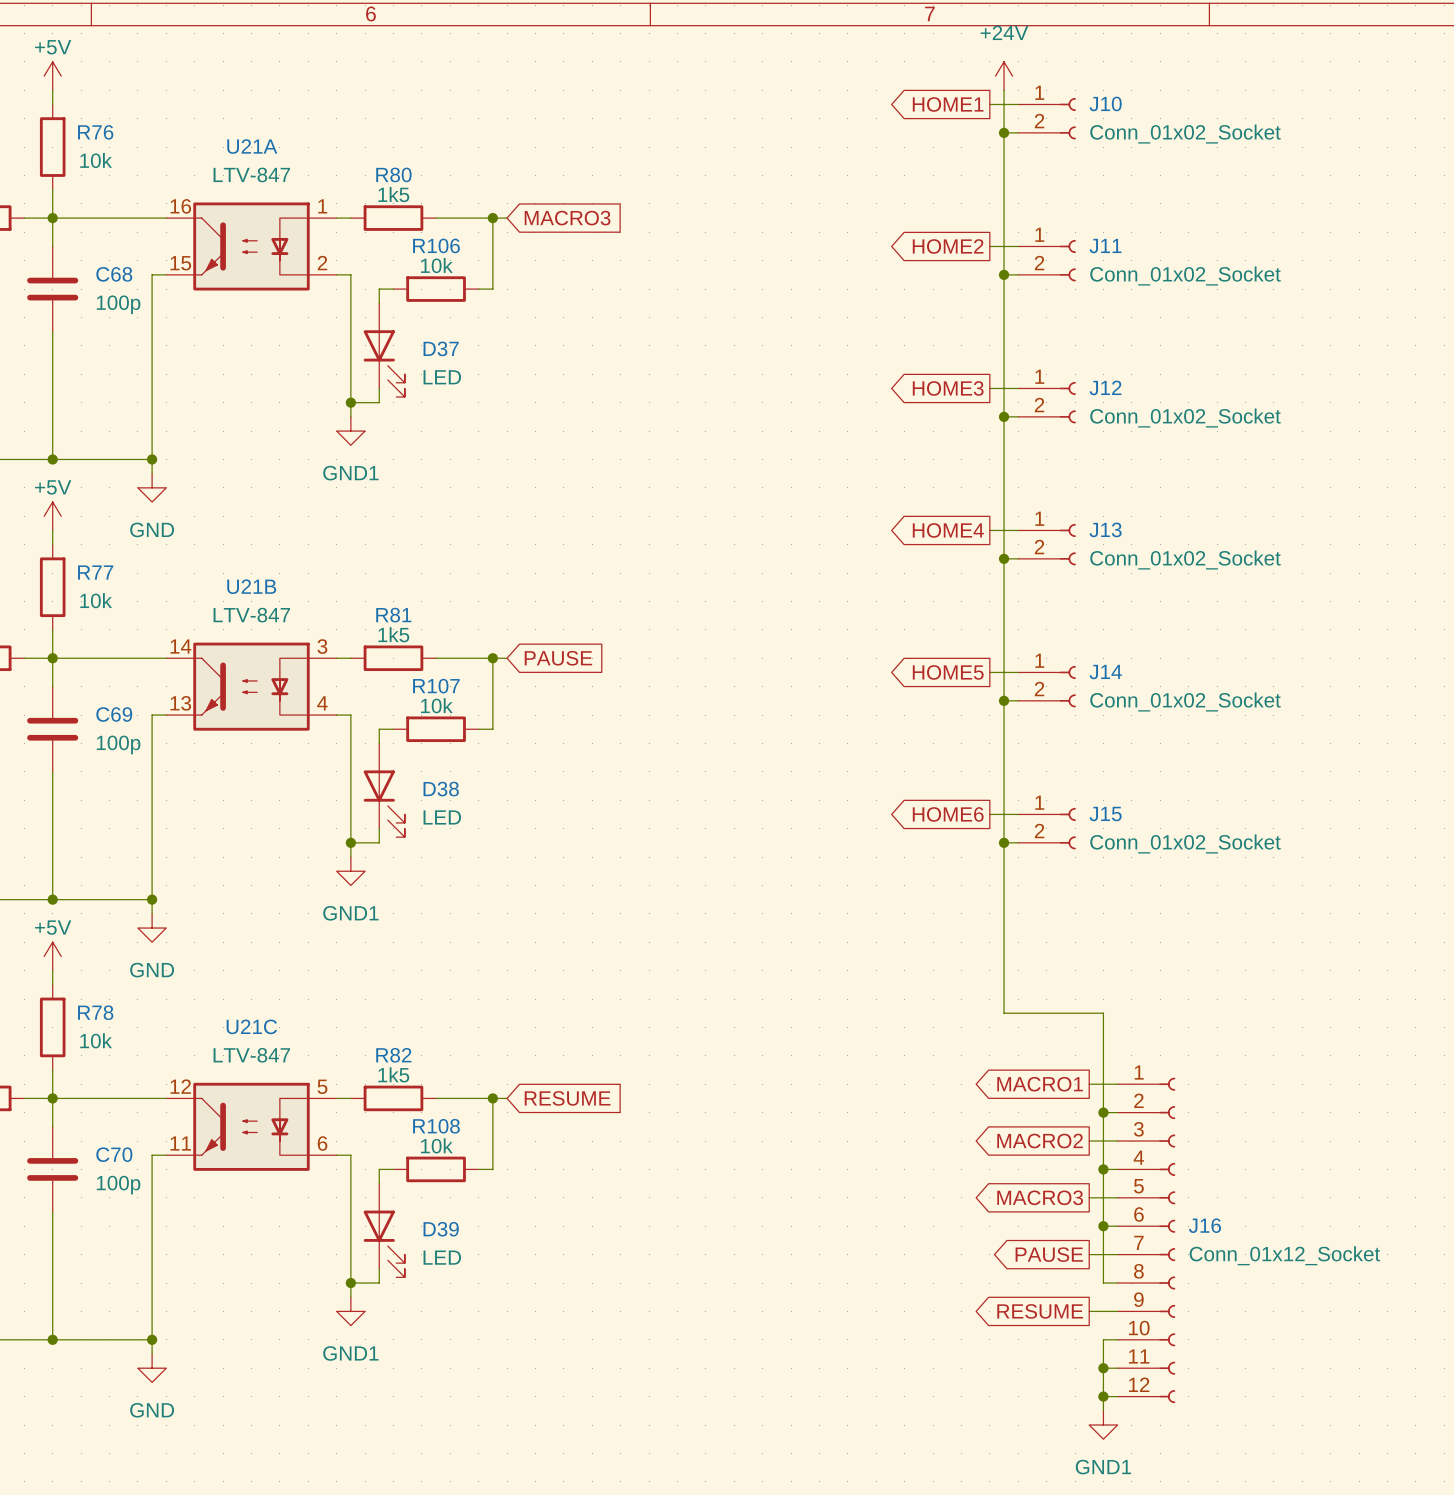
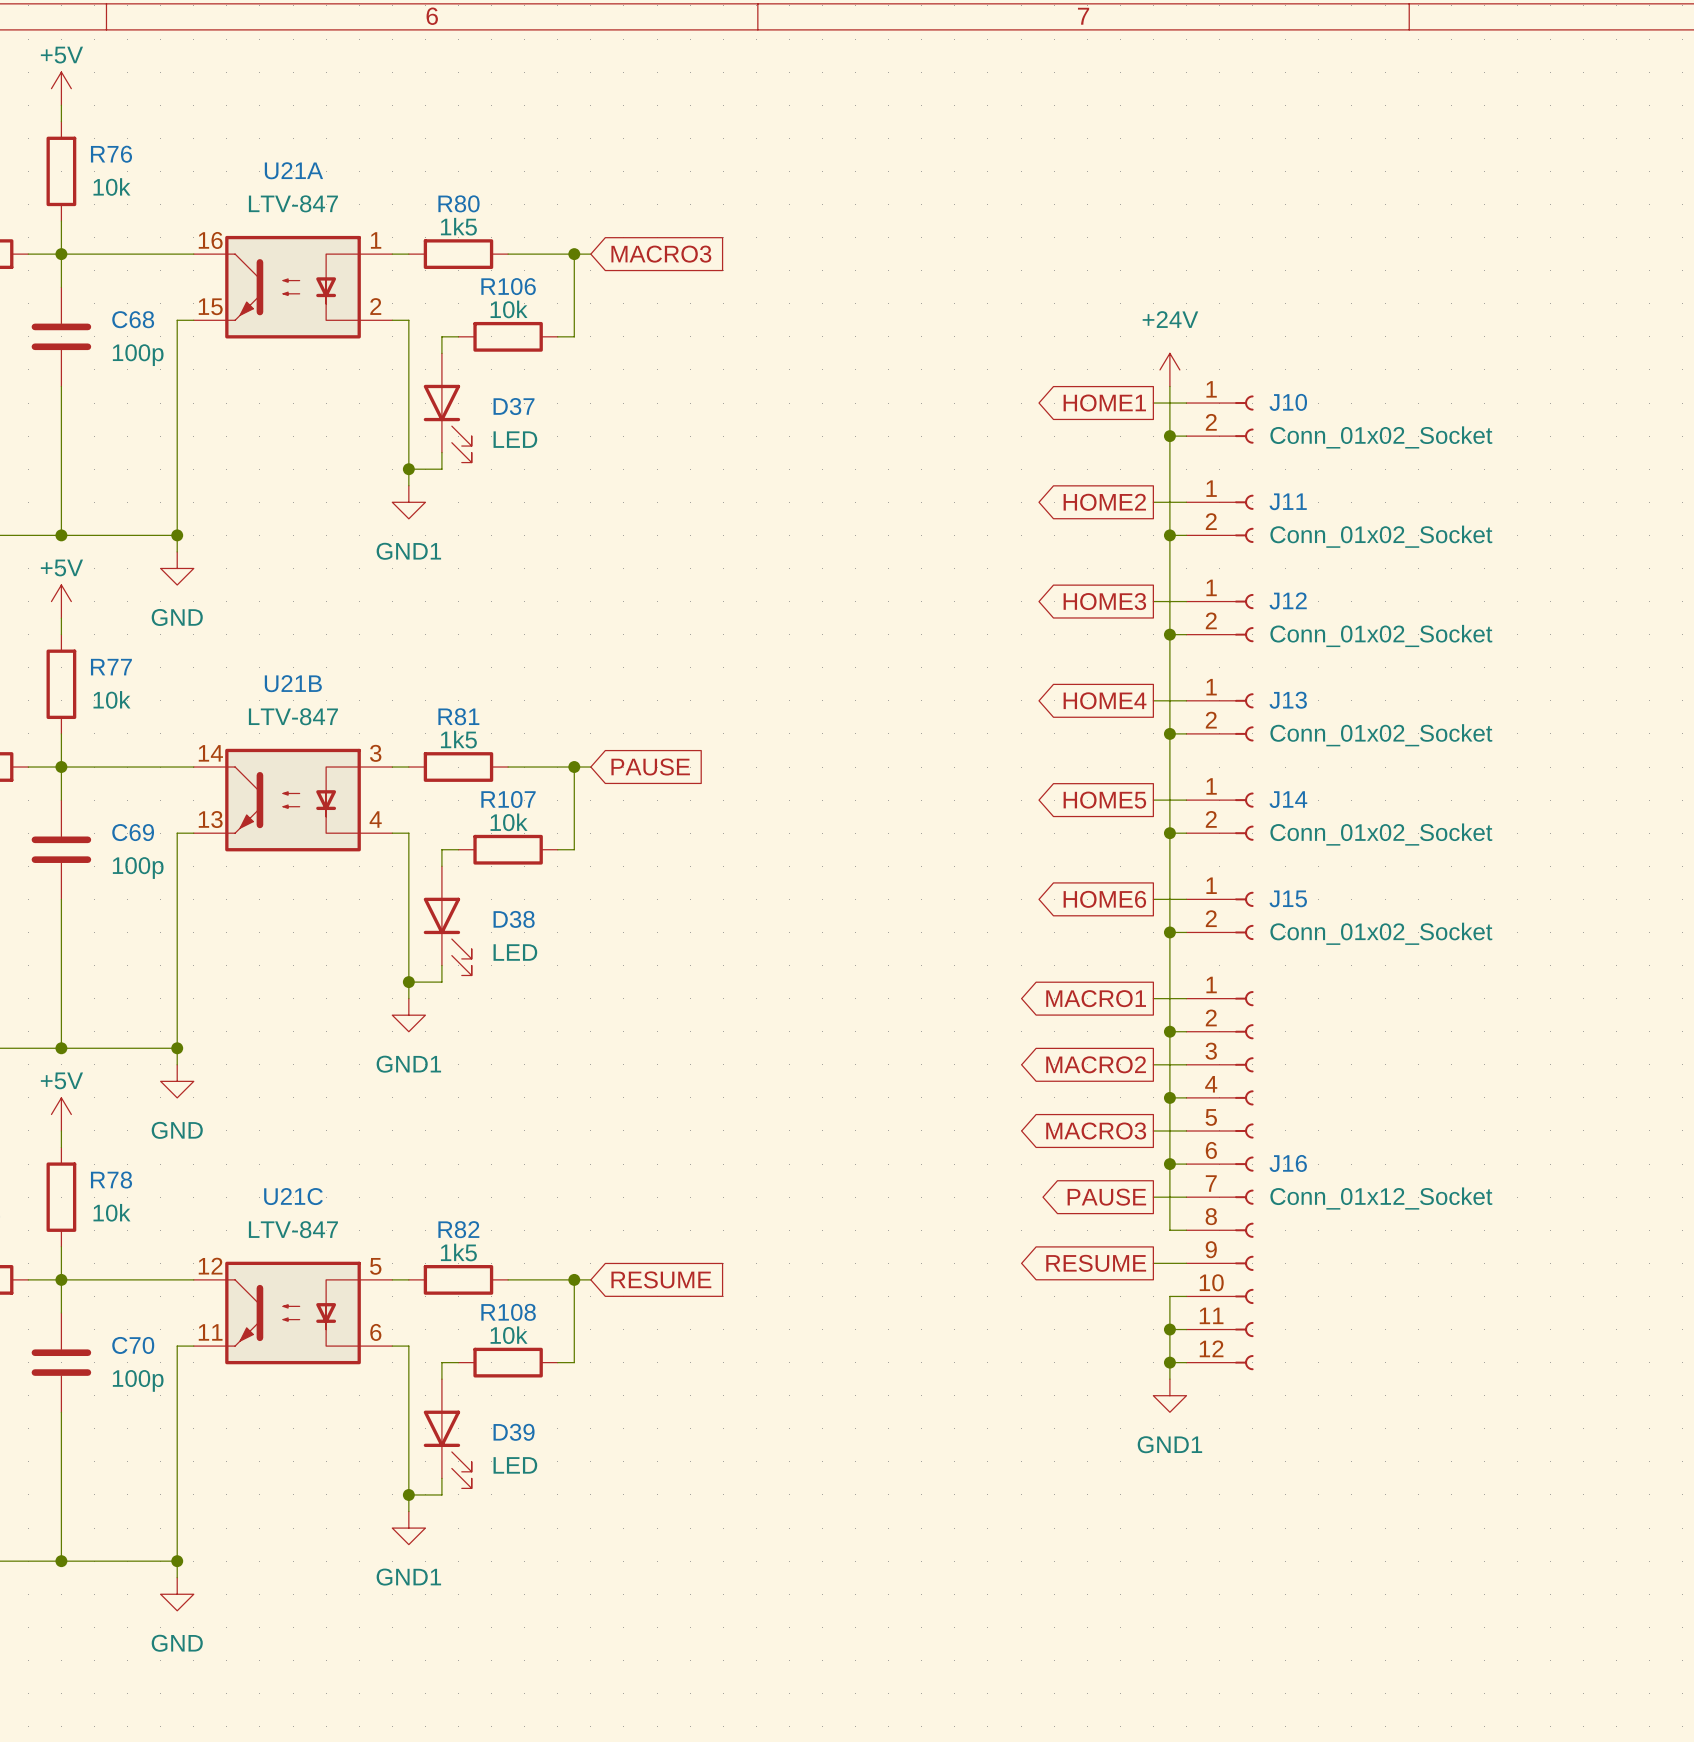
power symbol position: +24V (1004, 76) -> +24V (1169, 369)
wire: (1004, 90) (1004, 331) -> none
global label position: HOME1 (948, 104) -> HOME1 (1104, 403)
wire: (989, 104) (1018, 104) -> none
J10 position: (1047, 118) -> (1220, 419)
wire: (1004, 132) (1018, 132) -> none
junction: (1004, 132) -> none
global label position: HOME2 (948, 246) -> HOME2 (1104, 502)
wire: (989, 246) (1018, 246) -> (1153, 403) (1186, 403)
J11 position: (1047, 260) -> (1220, 518)
wire: (1004, 274) (1018, 274) -> (1169, 436) (1186, 436)
junction: (1004, 274) -> none
junction: none -> (1169, 436)
global label position: HOME3 (948, 388) -> HOME3 (1104, 601)
wire: (989, 388) (1018, 388) -> (1153, 502) (1186, 502)
J12 position: (1047, 402) -> (1220, 618)
wire: (1004, 416) (1018, 416) -> (1169, 535) (1186, 535)
junction: (1004, 416) -> none
junction: none -> (1169, 535)
wire: none -> (1153, 601) (1186, 601)
global label position: HOME4 (948, 530) -> HOME4 (1105, 700)
wire: (989, 530) (1018, 530) -> (1153, 800) (1186, 800)
wire: none -> (1169, 634) (1186, 634)
J13 position: (1047, 544) -> (1220, 717)
wire: (1004, 558) (1018, 558) -> (1169, 833) (1186, 833)
junction position: (1004, 558) -> (1169, 634)
junction: none -> (1169, 733)
global label position: HOME5 (948, 672) -> HOME5 (1104, 800)
wire: (989, 672) (1018, 672) -> (1153, 899) (1186, 899)
J14 position: (1047, 686) -> (1220, 816)
wire: (1004, 700) (1018, 700) -> (1169, 932) (1186, 932)
junction position: (1004, 700) -> (1169, 833)
junction: none -> (1169, 932)
global label position: HOME6 (948, 814) -> HOME6 (1104, 899)
wire: (989, 814) (1018, 814) -> (1153, 700) (1186, 700)
J15 position: (1047, 828) -> (1220, 915)
wire: (1004, 842) (1018, 842) -> (1169, 733) (1186, 733)
junction: (1004, 842) -> none
junction: none -> (1169, 1031)
junction: none -> (1169, 1097)
junction: none -> (1169, 1164)
wire: (1004, 1013) (1103, 1013) (1103, 1283) (1117, 1283) -> (1169, 1180) (1169, 1230) (1186, 1230)
global label position: MACRO1 (1040, 1084) -> MACRO1 (1096, 998)
wire: (1089, 1084) (1117, 1084) -> (1153, 998) (1186, 998)
wire: (1103, 1112) (1117, 1112) -> (1169, 1031) (1186, 1031)
junction: (1103, 1112) -> none
junction: none -> (1169, 1329)
global label position: MACRO2 (1040, 1141) -> MACRO2 (1096, 1064)
wire: (1089, 1141) (1117, 1141) -> (1153, 1064) (1186, 1064)
junction: none -> (1169, 1362)
wire: (1103, 1169) (1117, 1169) -> (1169, 1097) (1186, 1097)
junction: (1103, 1169) -> none
global label position: MACRO3 (1040, 1197) -> MACRO3 (1096, 1130)
wire: (1089, 1197) (1117, 1197) -> (1153, 1130) (1186, 1130)
wire: (1103, 1226) (1117, 1226) -> (1169, 1164) (1186, 1164)
junction: (1103, 1226) -> none
J16 position: (1146, 1240) -> (1220, 1180)
global label position: PAUSE (1049, 1254) -> PAUSE (1106, 1197)
wire: (1089, 1254) (1117, 1254) -> (1153, 1197) (1186, 1197)
global label position: RESUME (1040, 1311) -> RESUME (1096, 1263)
wire: (1089, 1311) (1117, 1311) -> (1153, 1263) (1186, 1263)
wire: (1117, 1339) (1103, 1339) (1103, 1410) -> (1186, 1296) (1169, 1296) (1169, 1379)
wire: (1103, 1368) (1117, 1368) -> (1169, 1329) (1186, 1329)
junction: (1103, 1368) -> none
wire: (1103, 1396) (1117, 1396) -> (1169, 1362) (1186, 1362)
junction: (1103, 1396) -> none
power symbol position: GND1 (1103, 1425) -> GND1 (1169, 1395)

